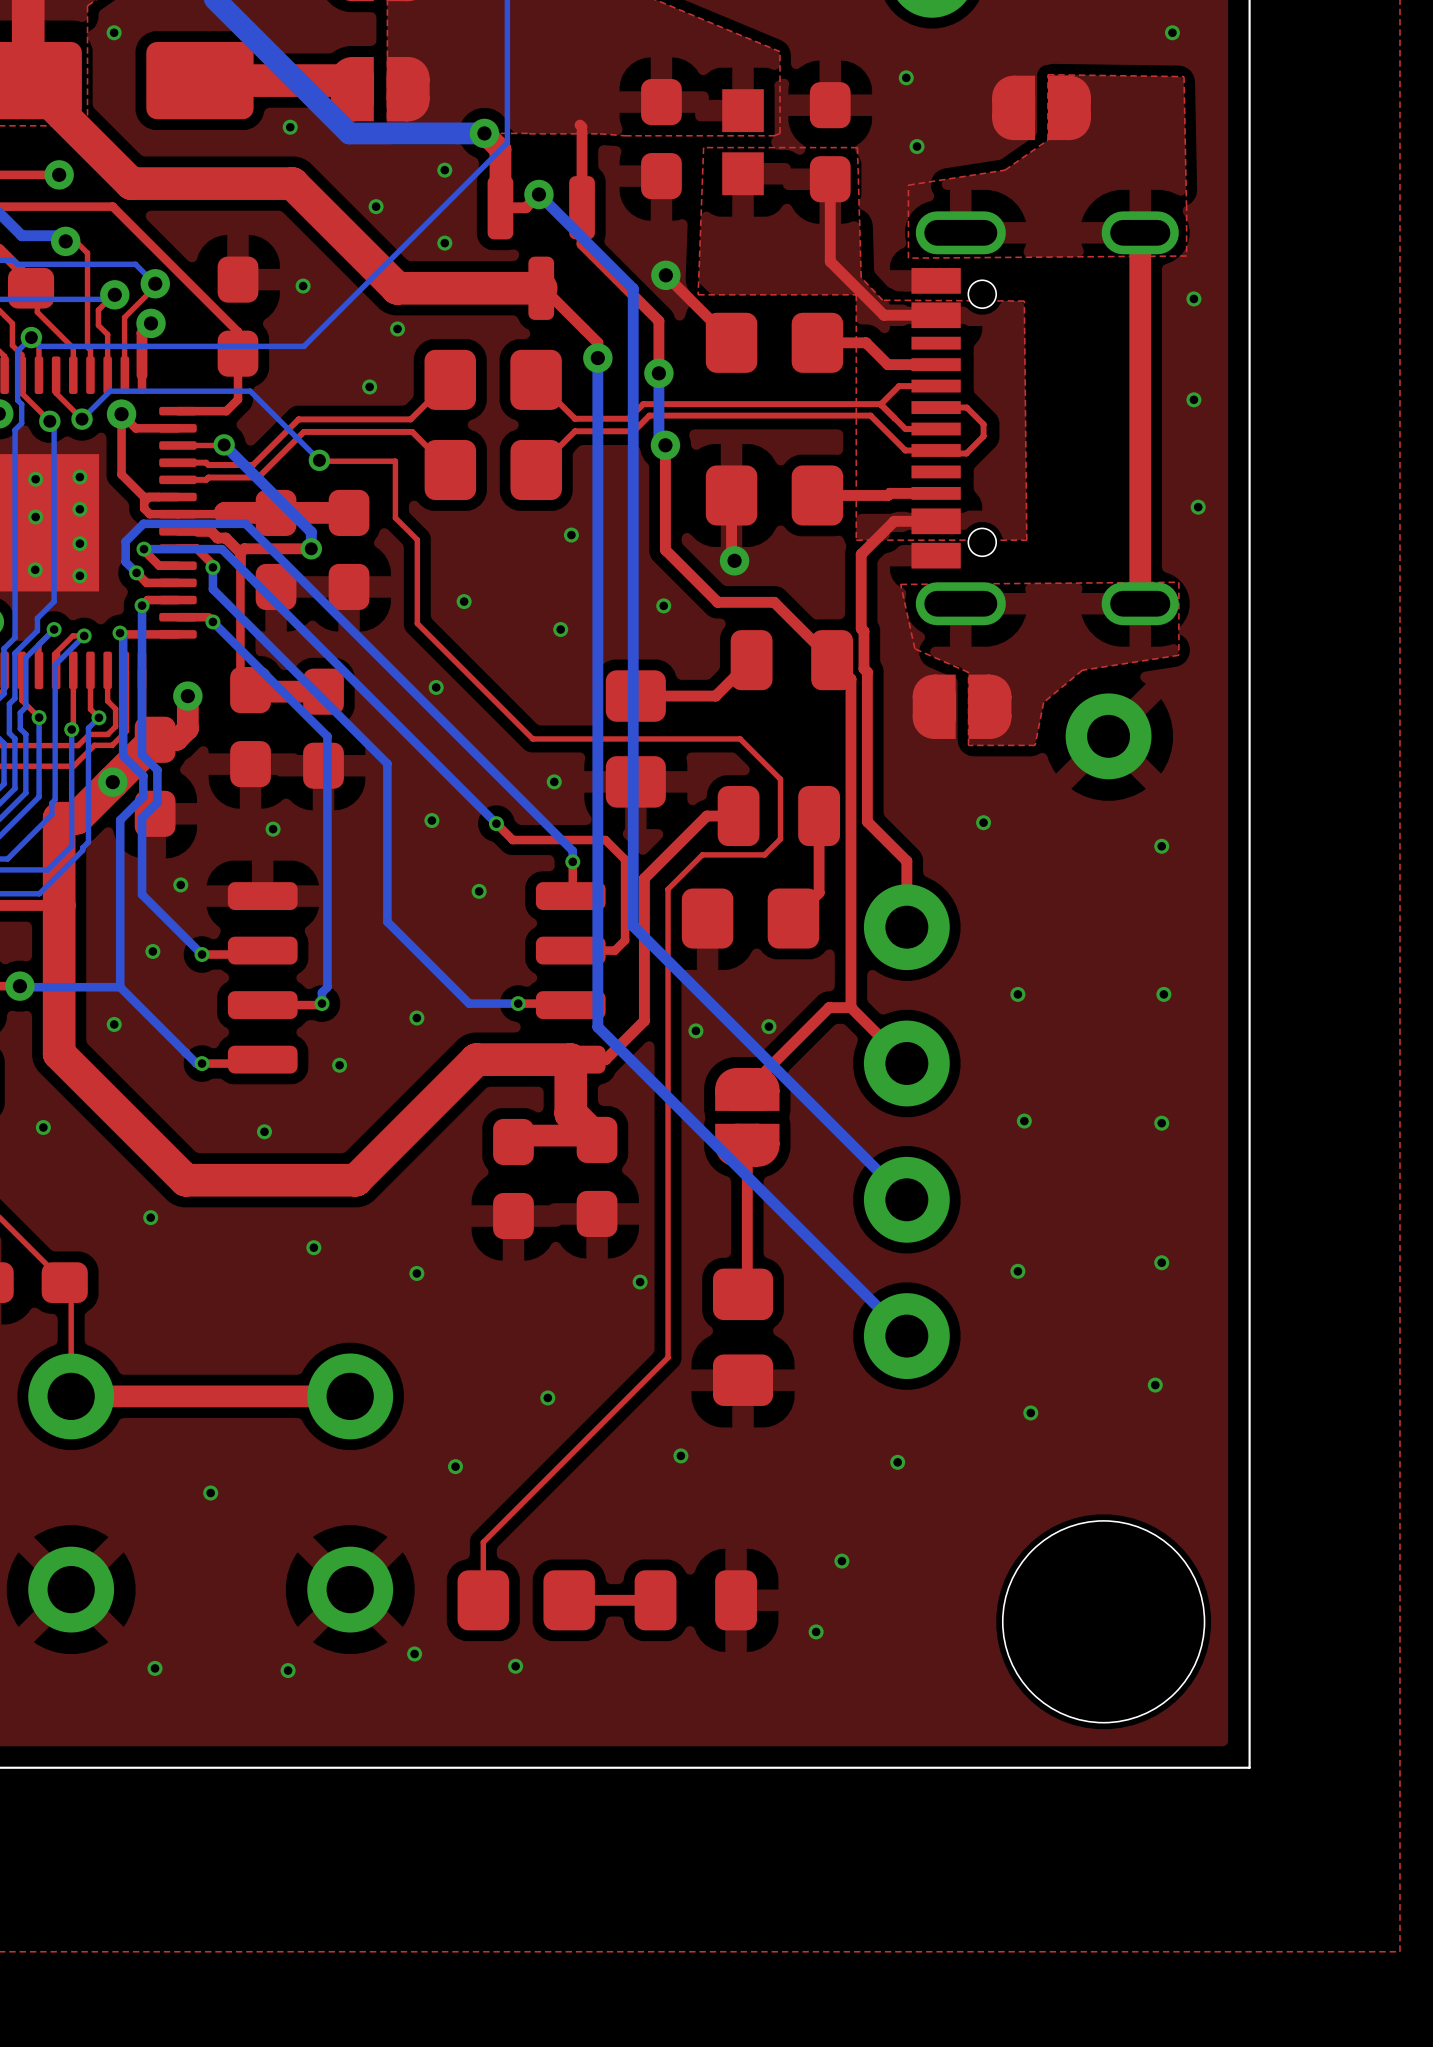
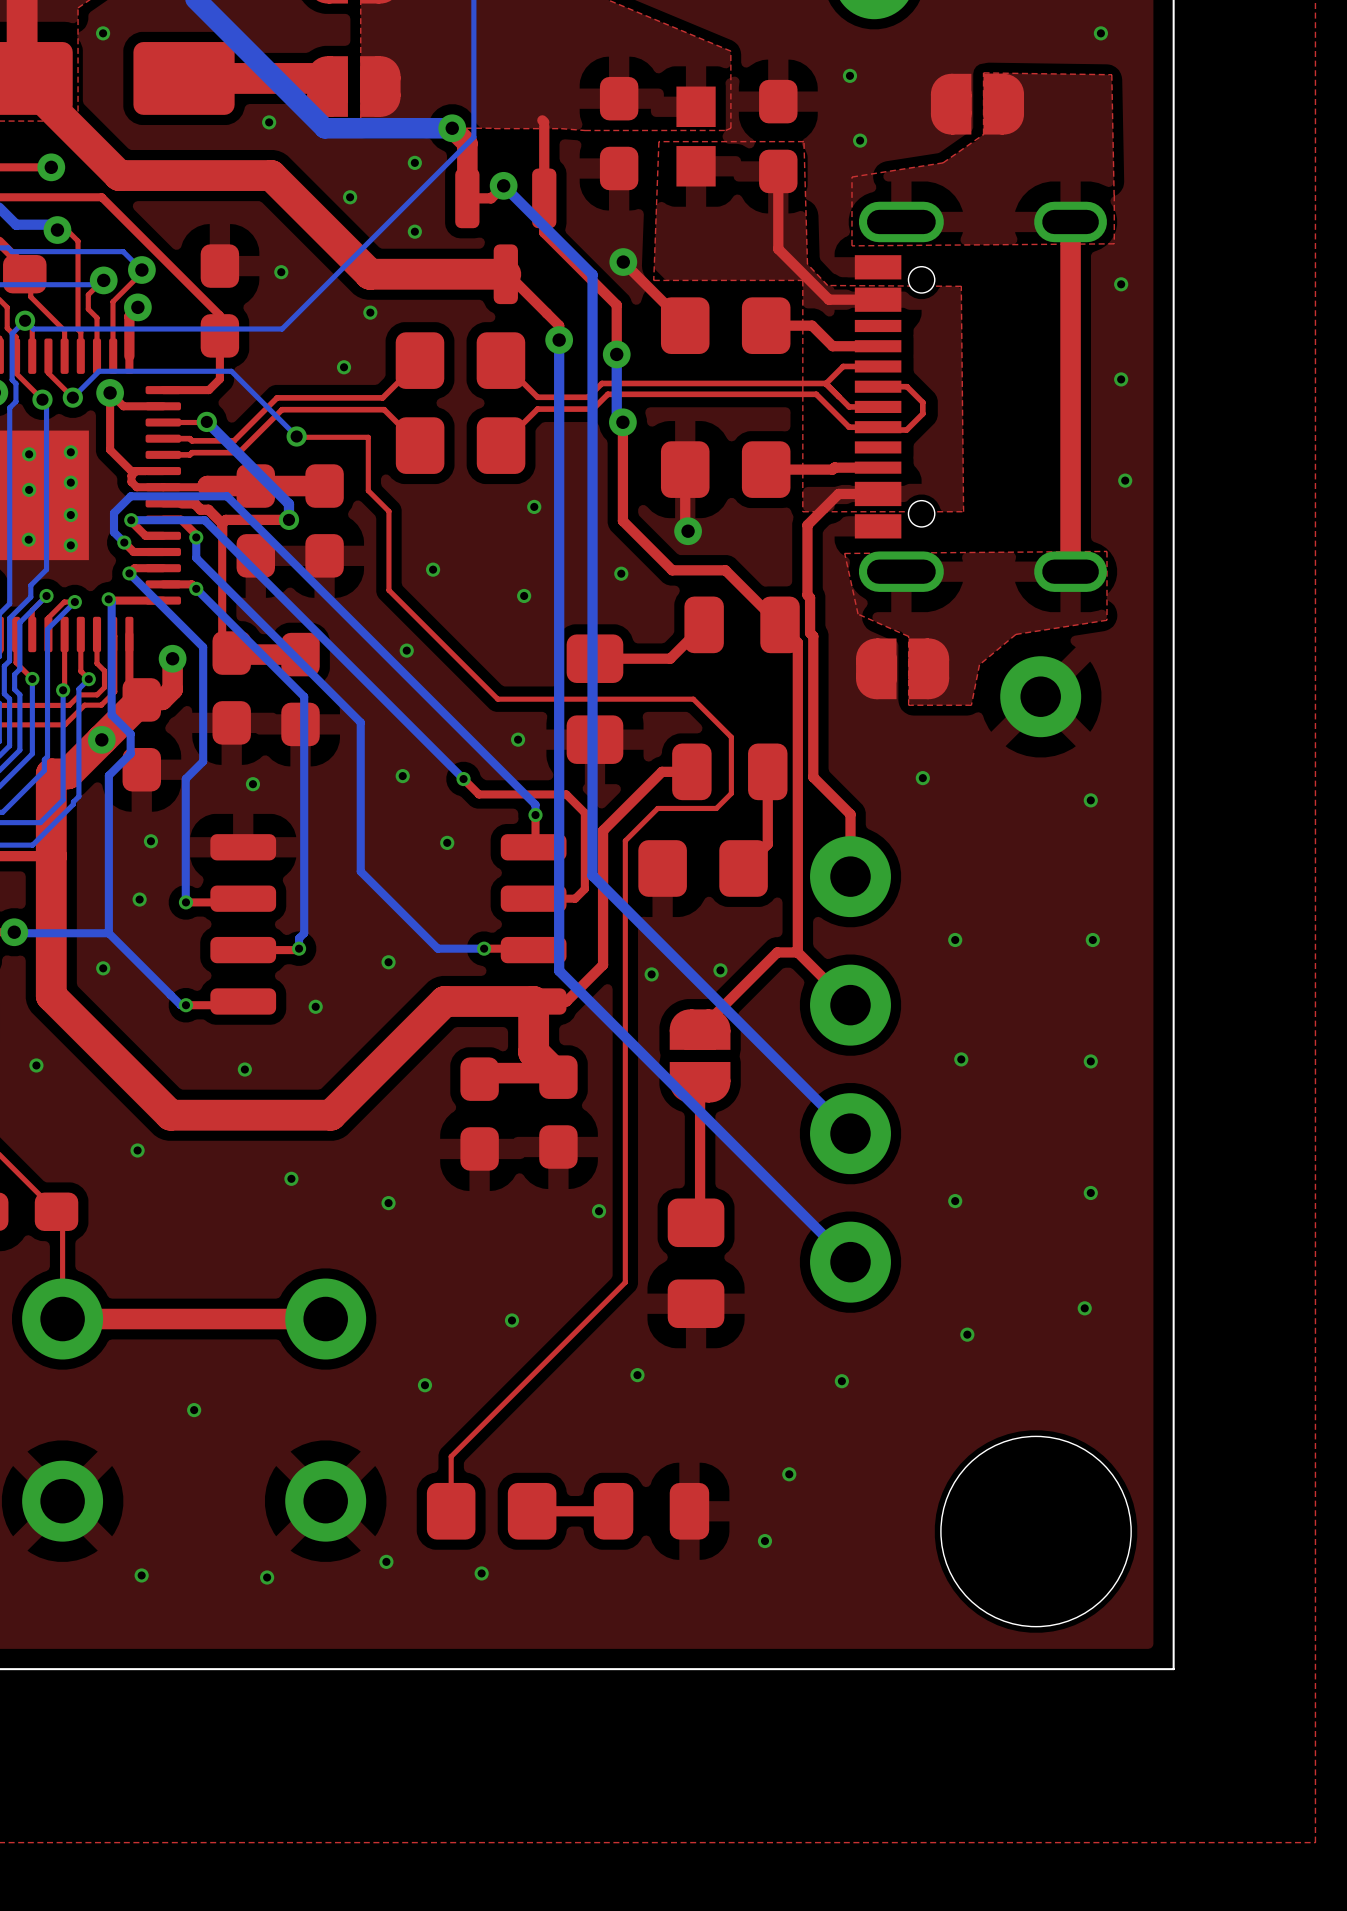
bottom track: (142, 605) (142, 754) (157, 770) (157, 802) (142, 818) (142, 894) (201, 954) -> (129, 573) (203, 647) (203, 761) (185, 778) (185, 902)
via position: (180, 884) -> (150, 841)

